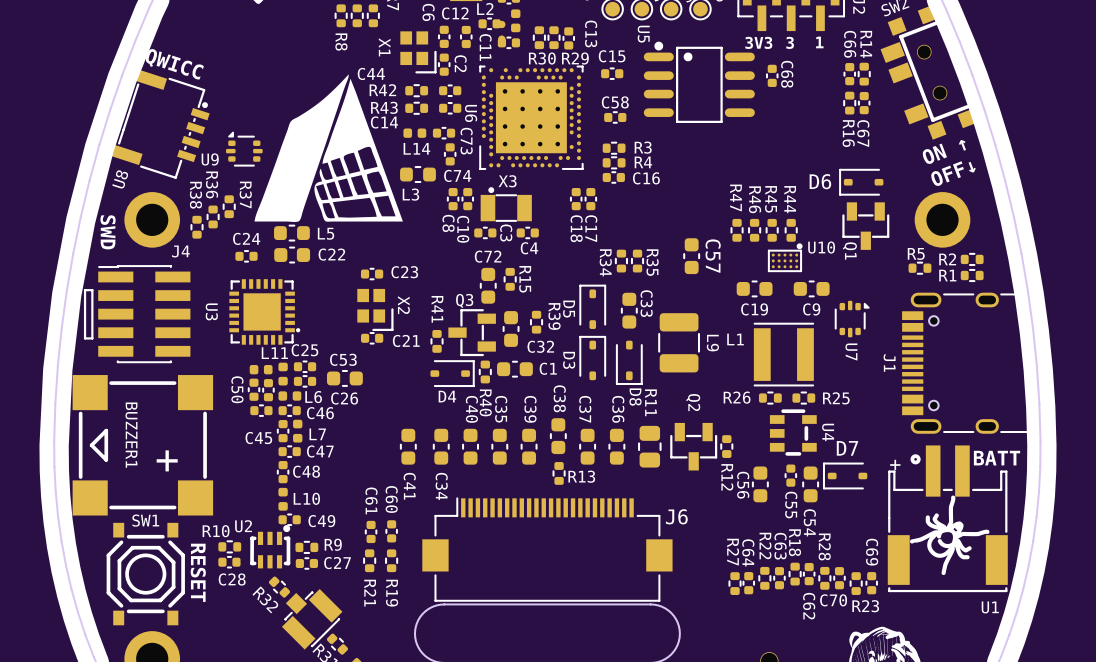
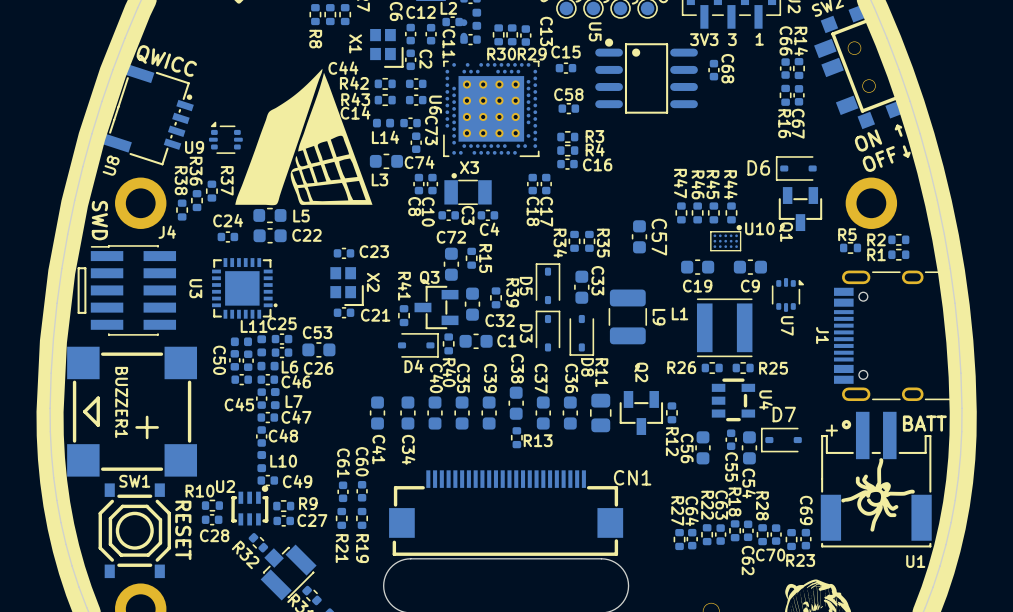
J6: (547, 549) -> none
CN1: none -> (506, 513)

